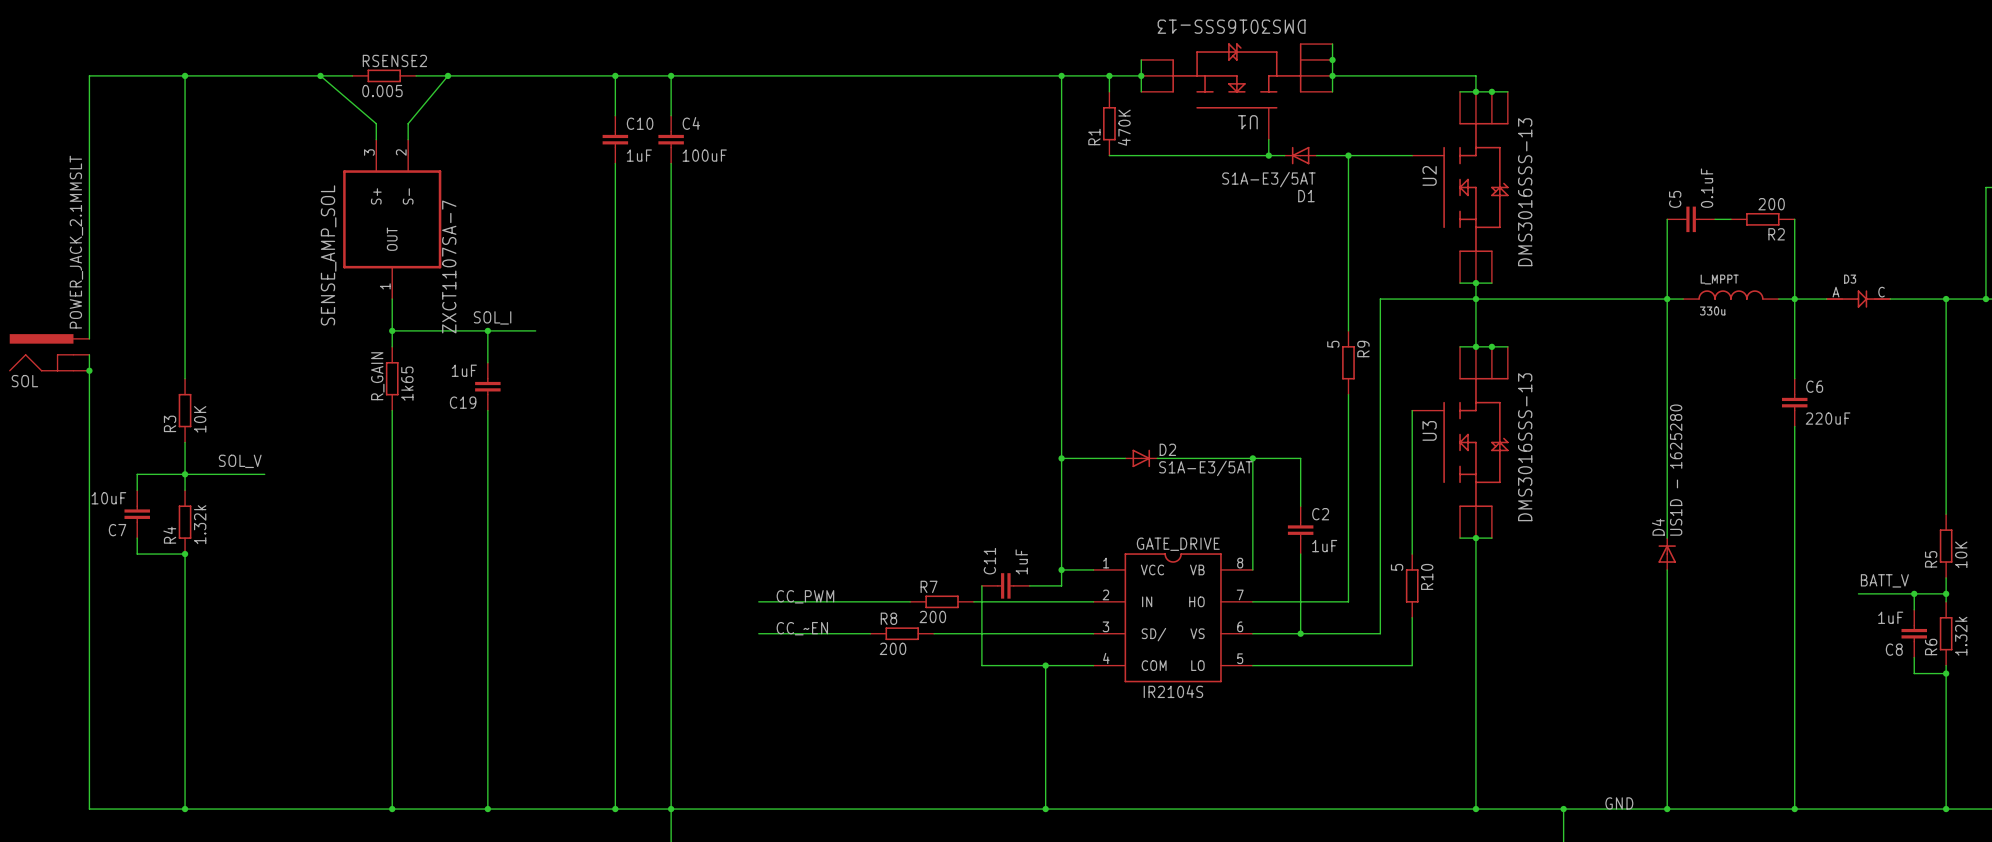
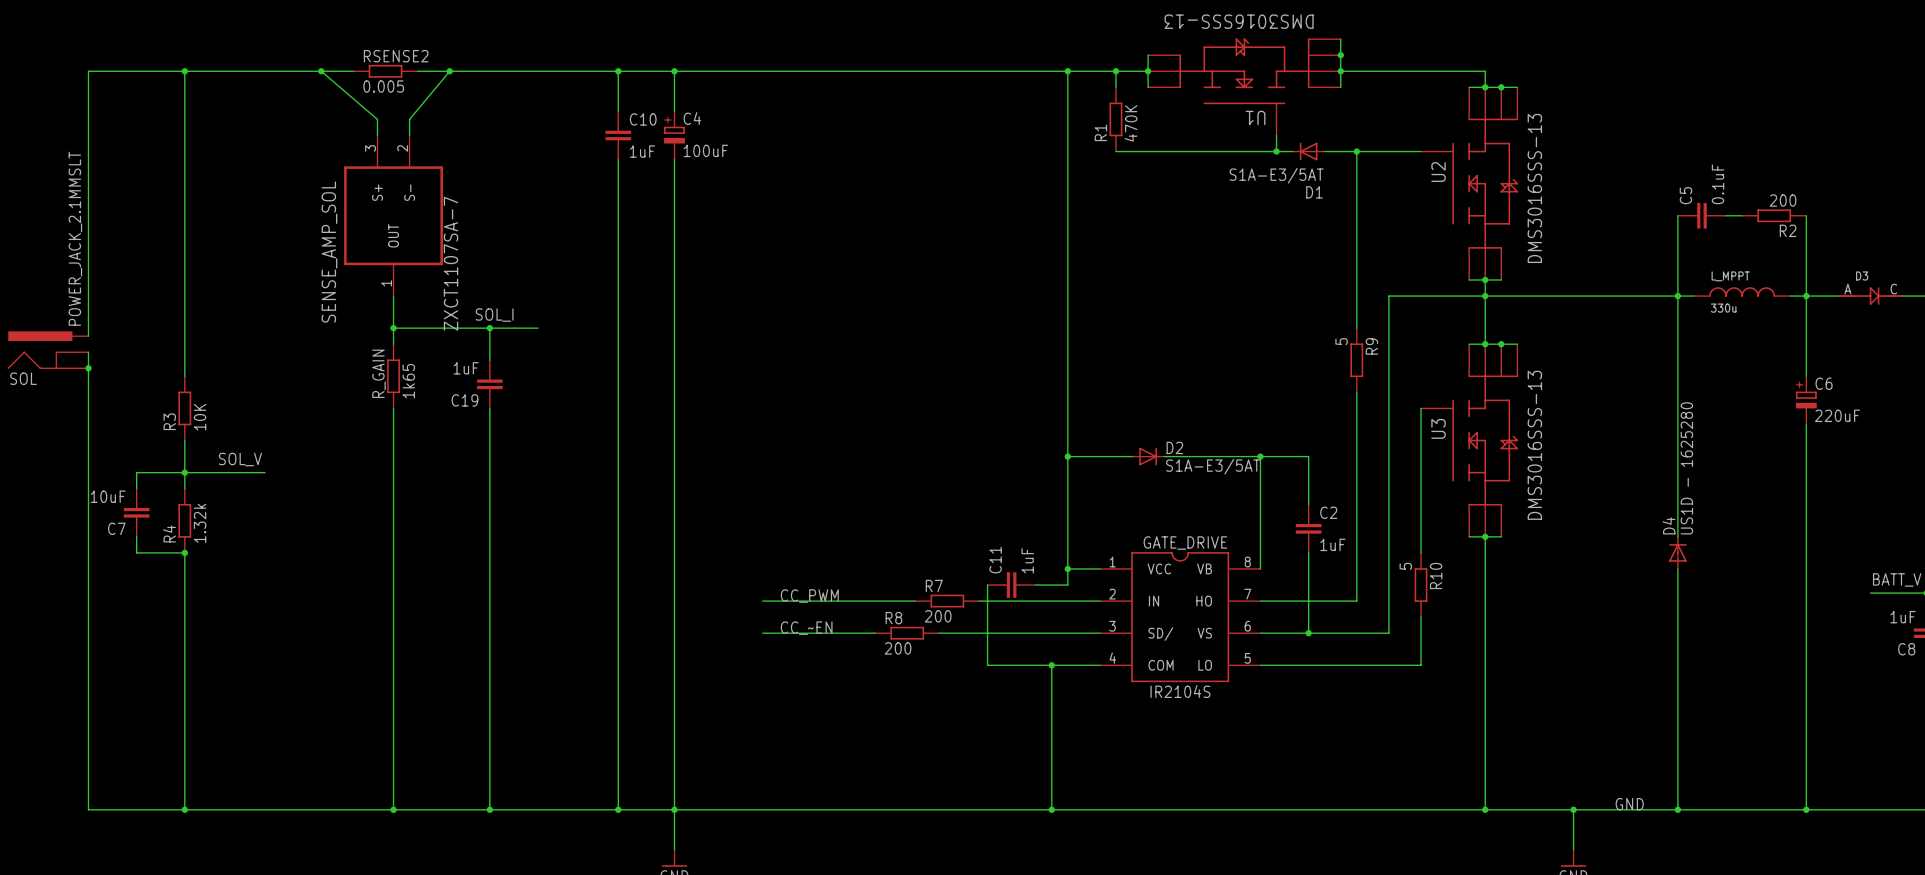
C4 symbol: [658, 115, 684, 164] -> [664, 111, 685, 160]
C6 symbol: [1781, 378, 1808, 427] -> [1795, 376, 1817, 425]

